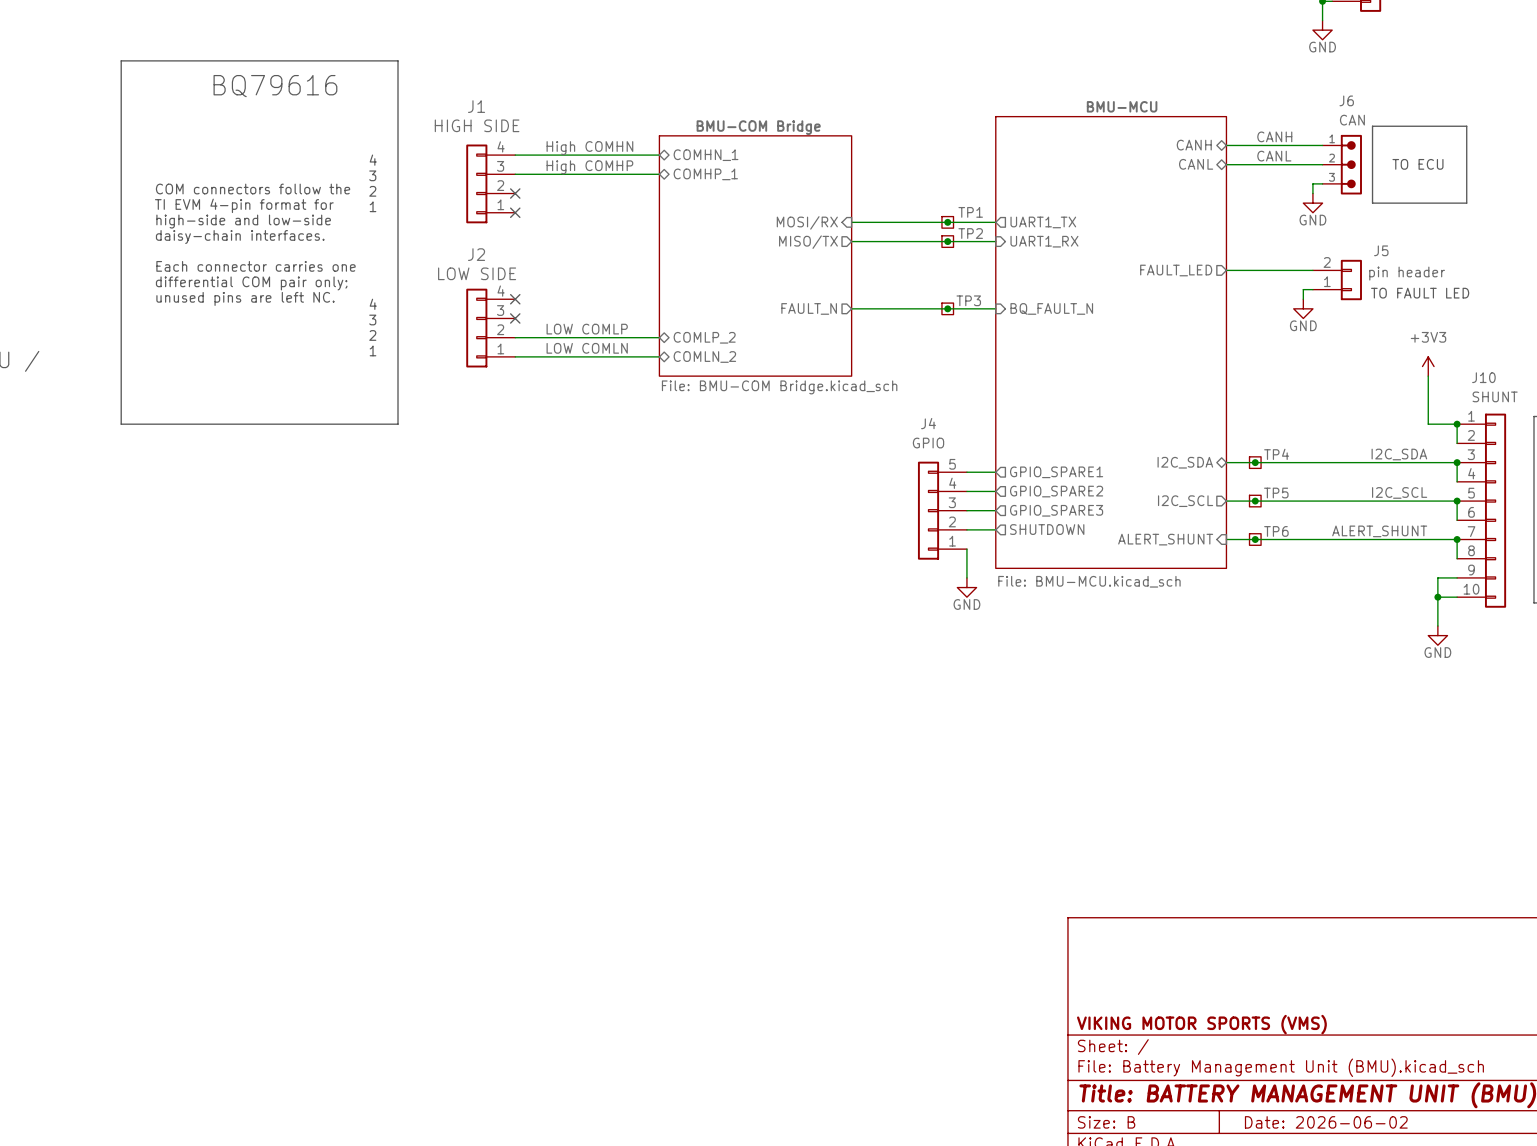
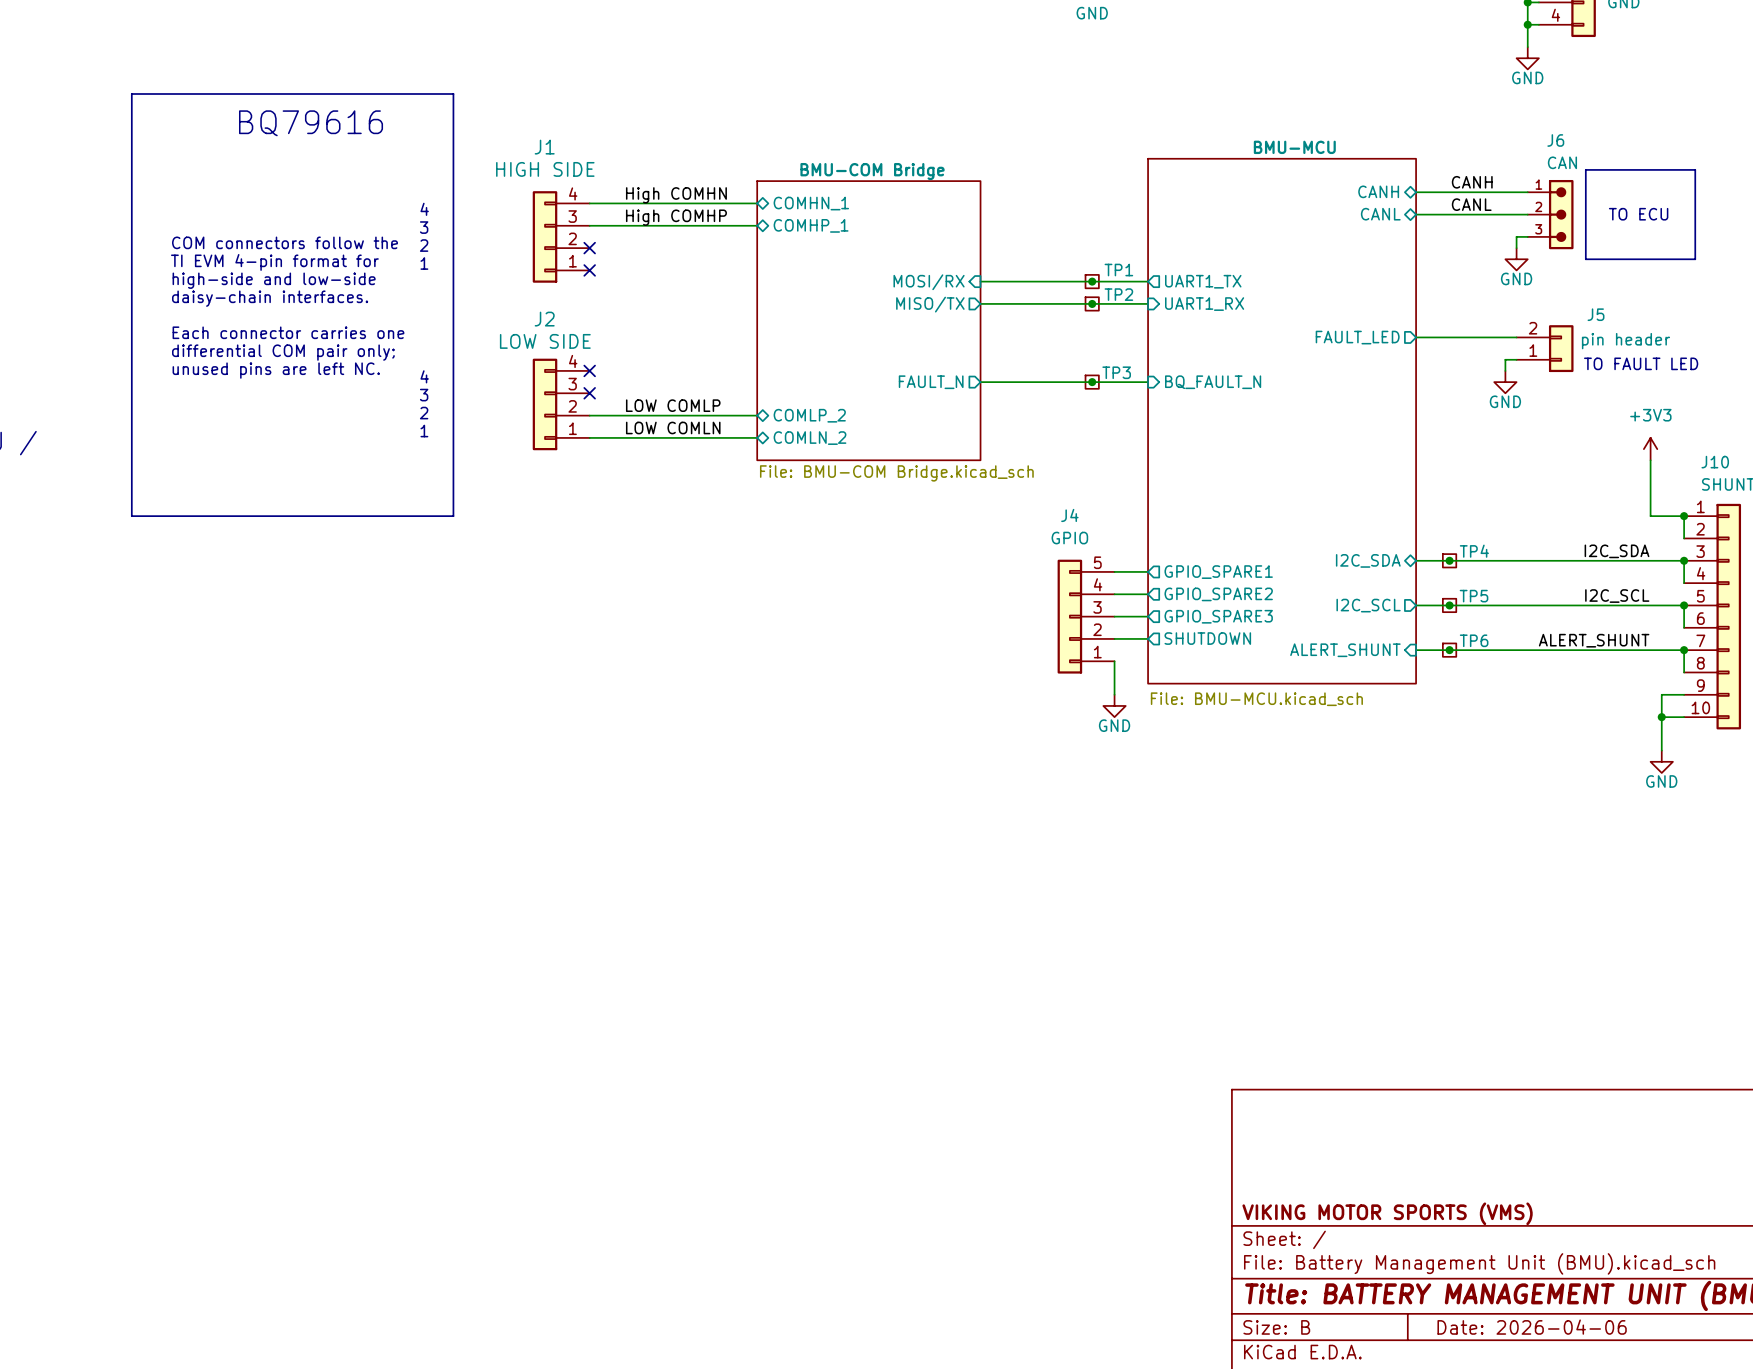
title block: Date: 2026-06-02 (1326, 1122) -> Date: 2026-04-06 (1532, 1327)

